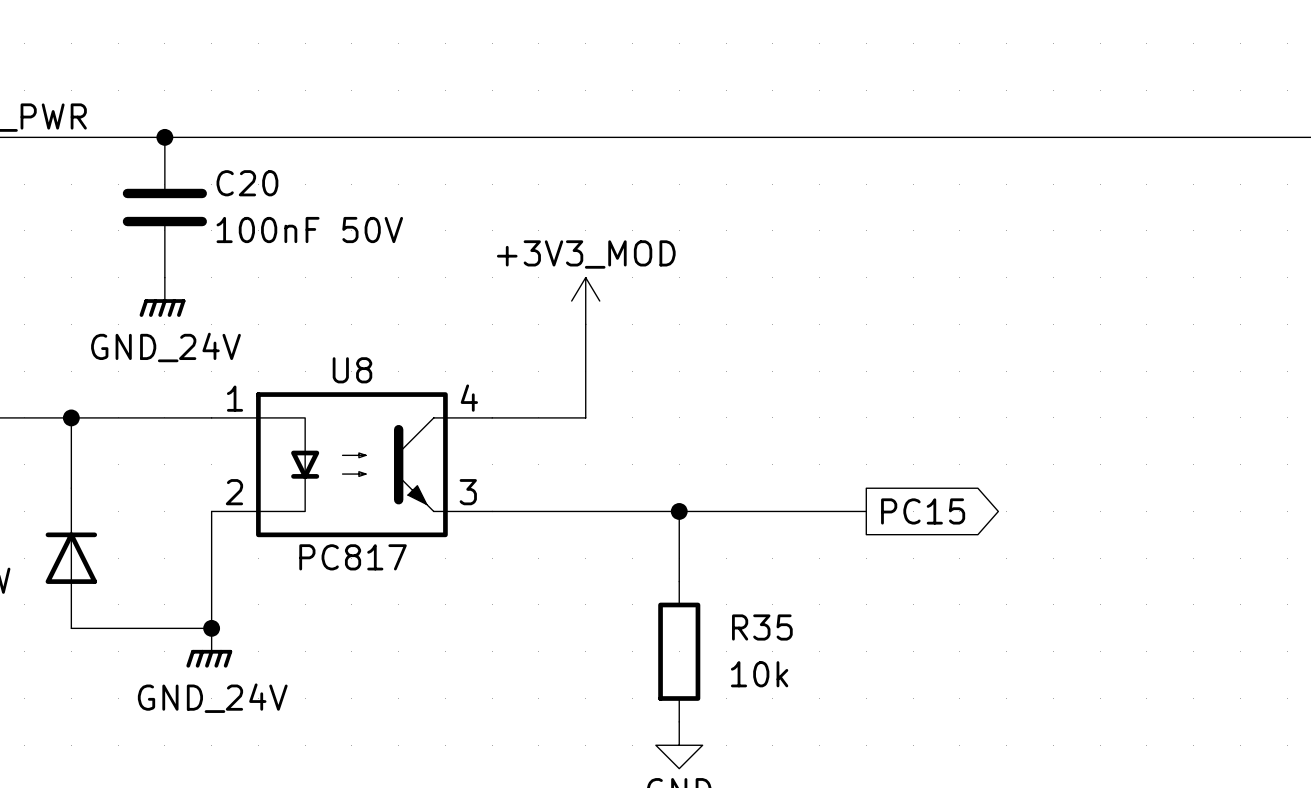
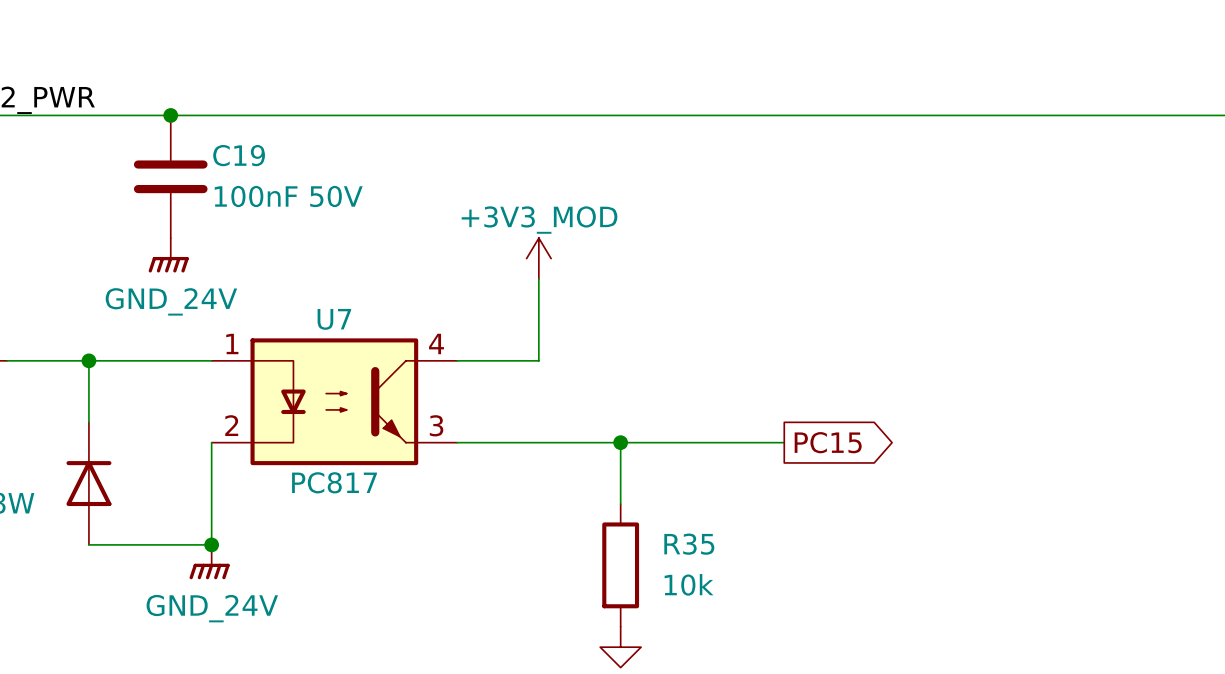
C20 name: C20 (247, 183) -> C19 (239, 155)
U8 name: U8 (352, 370) -> U7 (334, 319)

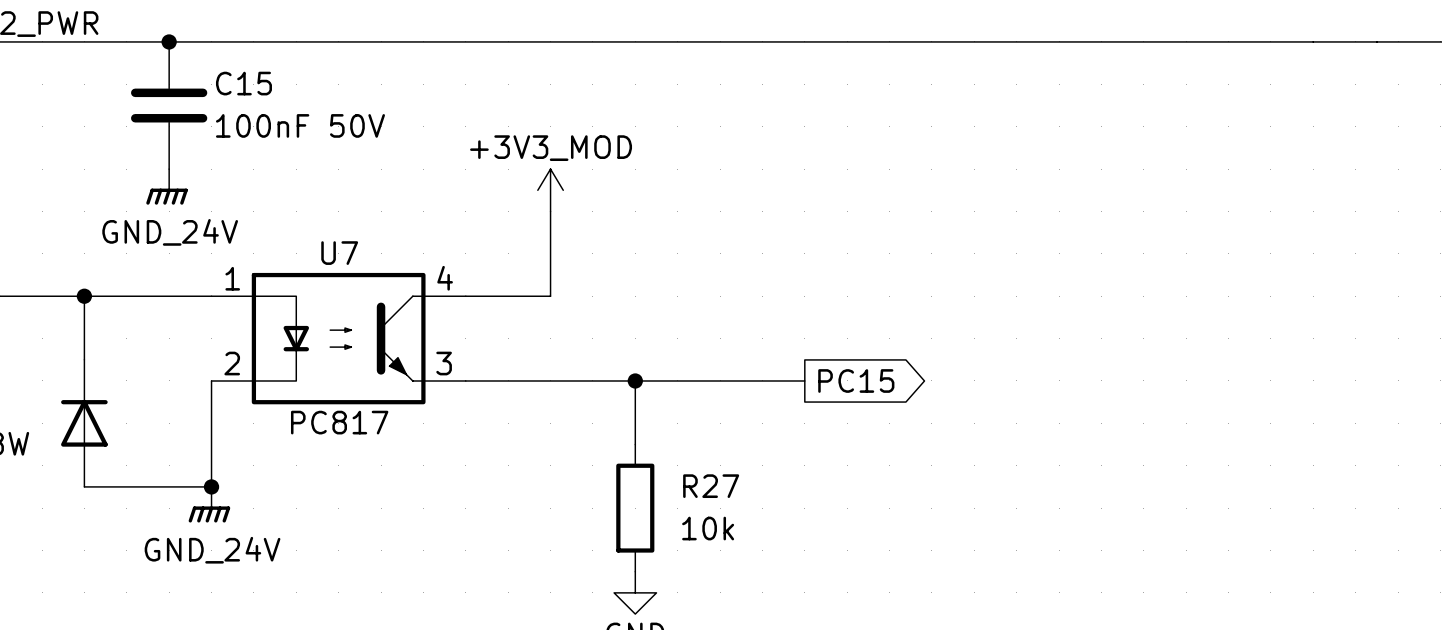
C19 name: C19 (239, 155) -> C15 (243, 83)
R35 name: R35 (689, 544) -> R27 (711, 486)

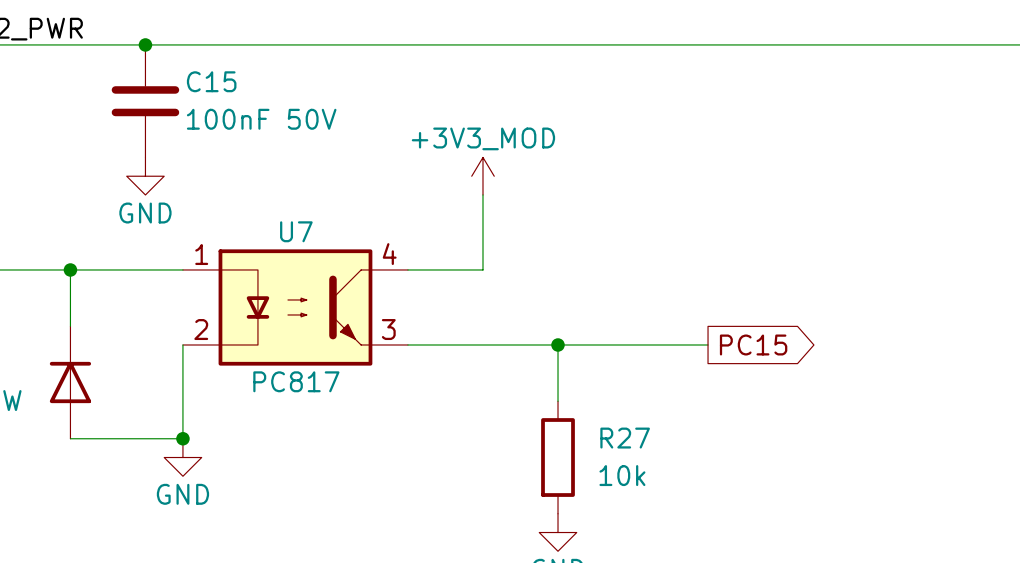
power symbol: GND_24V (167, 186) -> GND (145, 176)
power symbol: GND_24V (209, 504) -> GND (182, 457)

